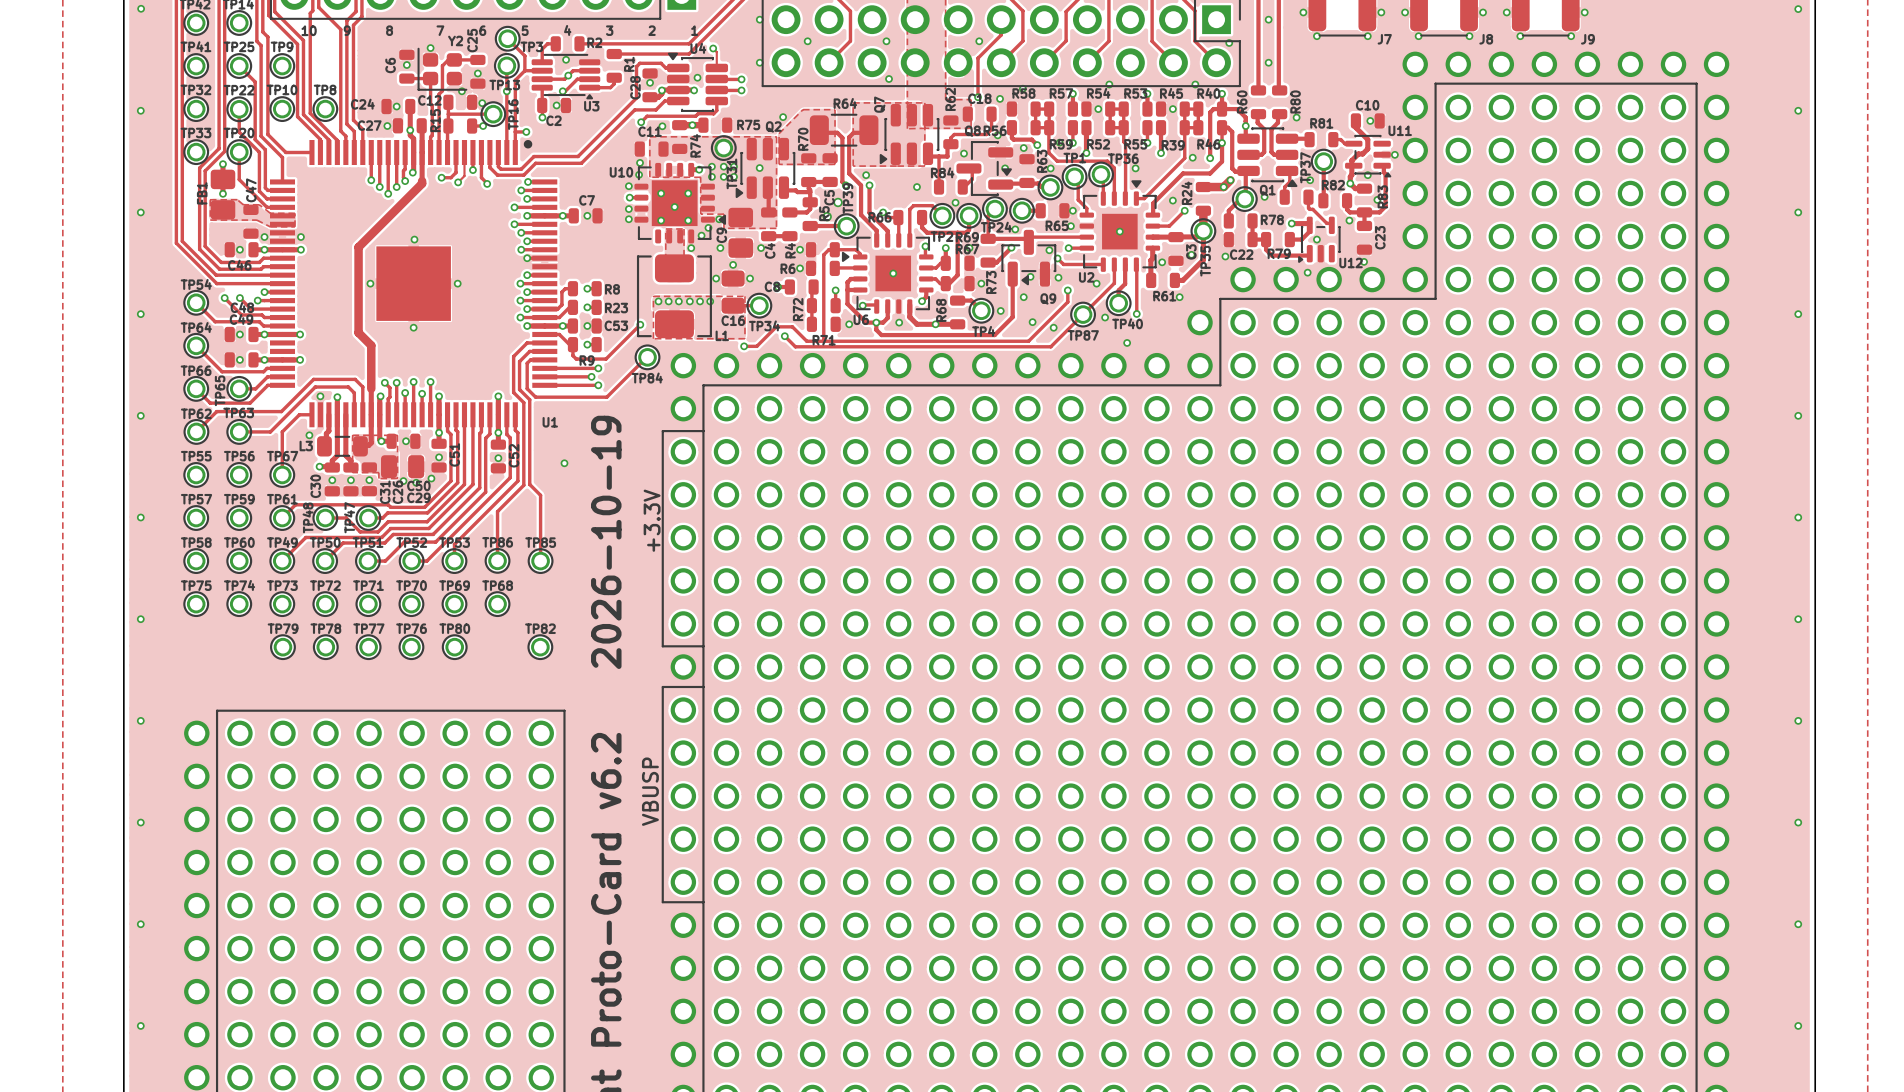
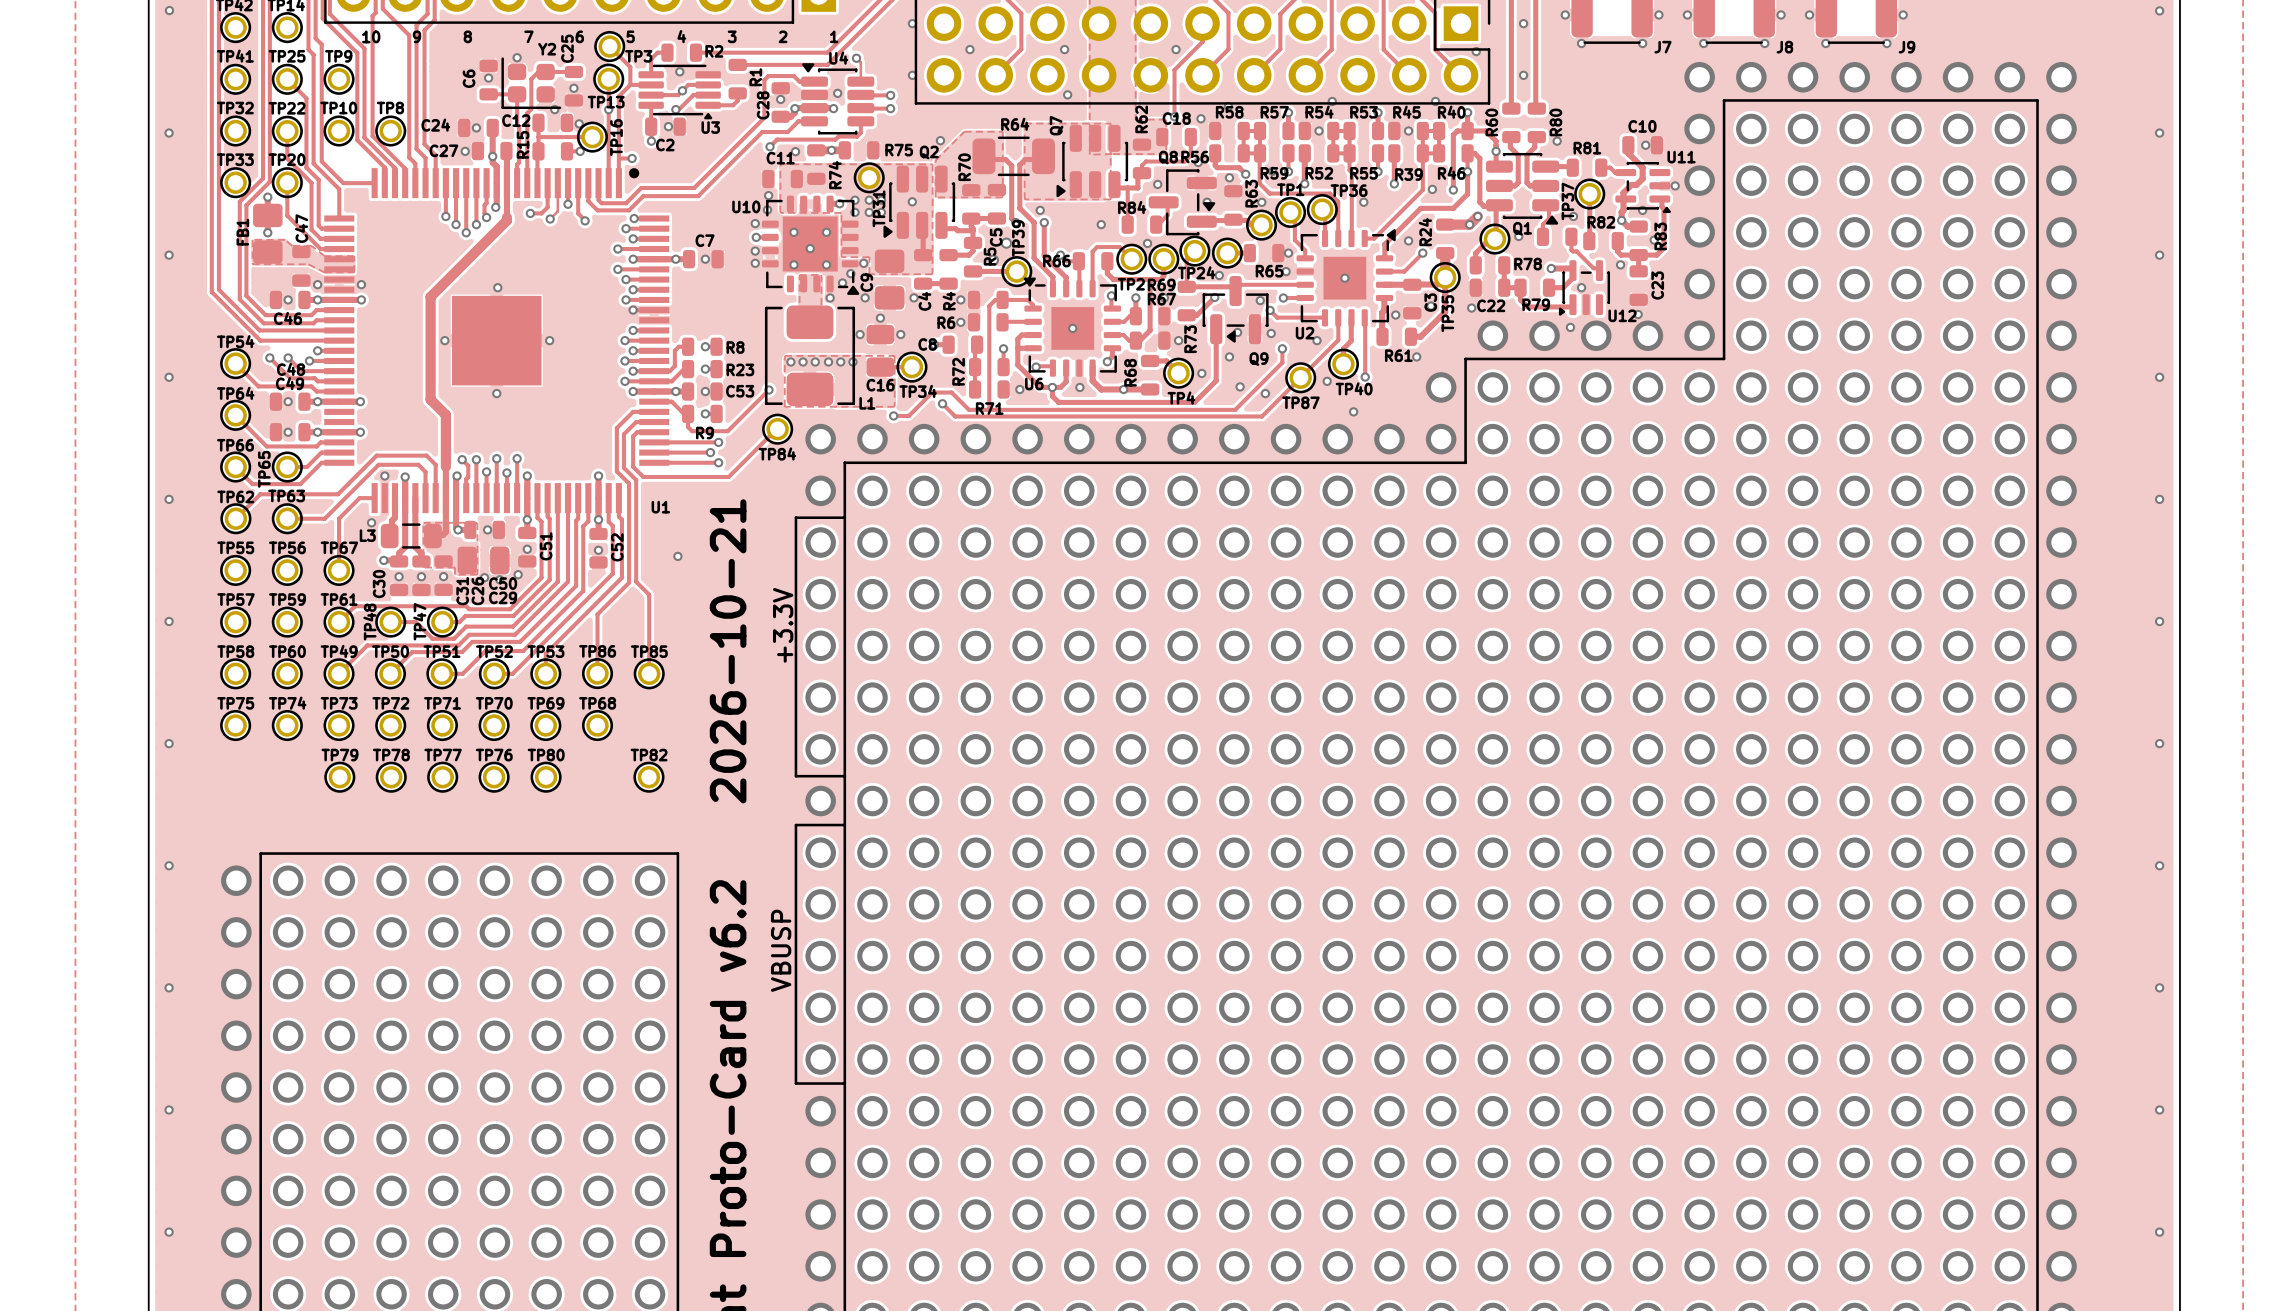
U10 footprint: [634, 162, 727, 244] -> [761, 195, 860, 295]
U2 footprint: [1079, 180, 1161, 272] -> [1296, 229, 1396, 327]
U6 footprint: [841, 233, 934, 314] -> [1023, 277, 1122, 377]
text: 2026-10-19 (606, 542) -> 2026-10-21 (728, 651)

